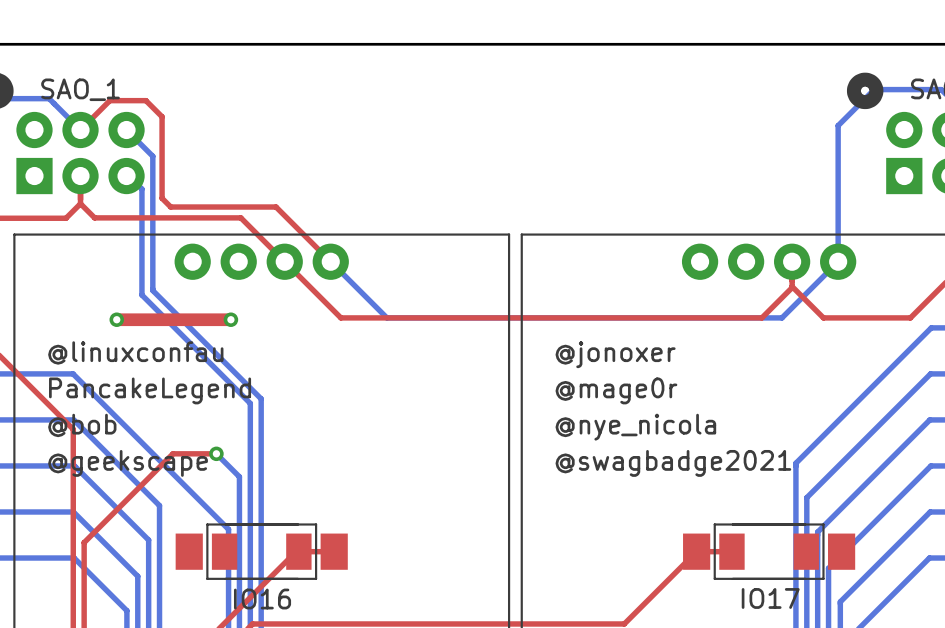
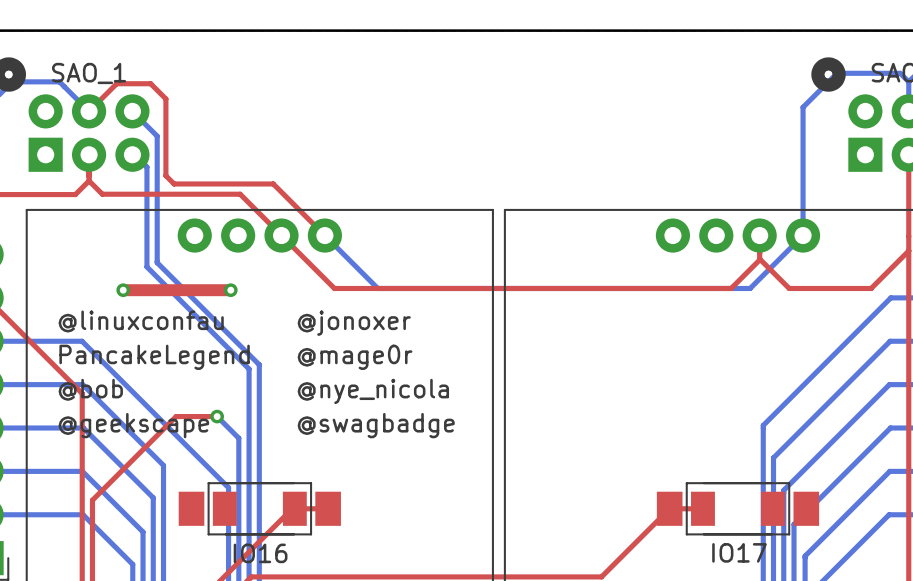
text position: @jonoxer (615, 354) -> @jonoxer (354, 323)
text position: @mage0r (616, 390) -> @mage0r (355, 357)
text position: @nye_nicola (635, 427) -> @nye_nicola (373, 391)
text: none -> @swagbadge (376, 425)
text: @swagbadge2021 (673, 463) -> none

